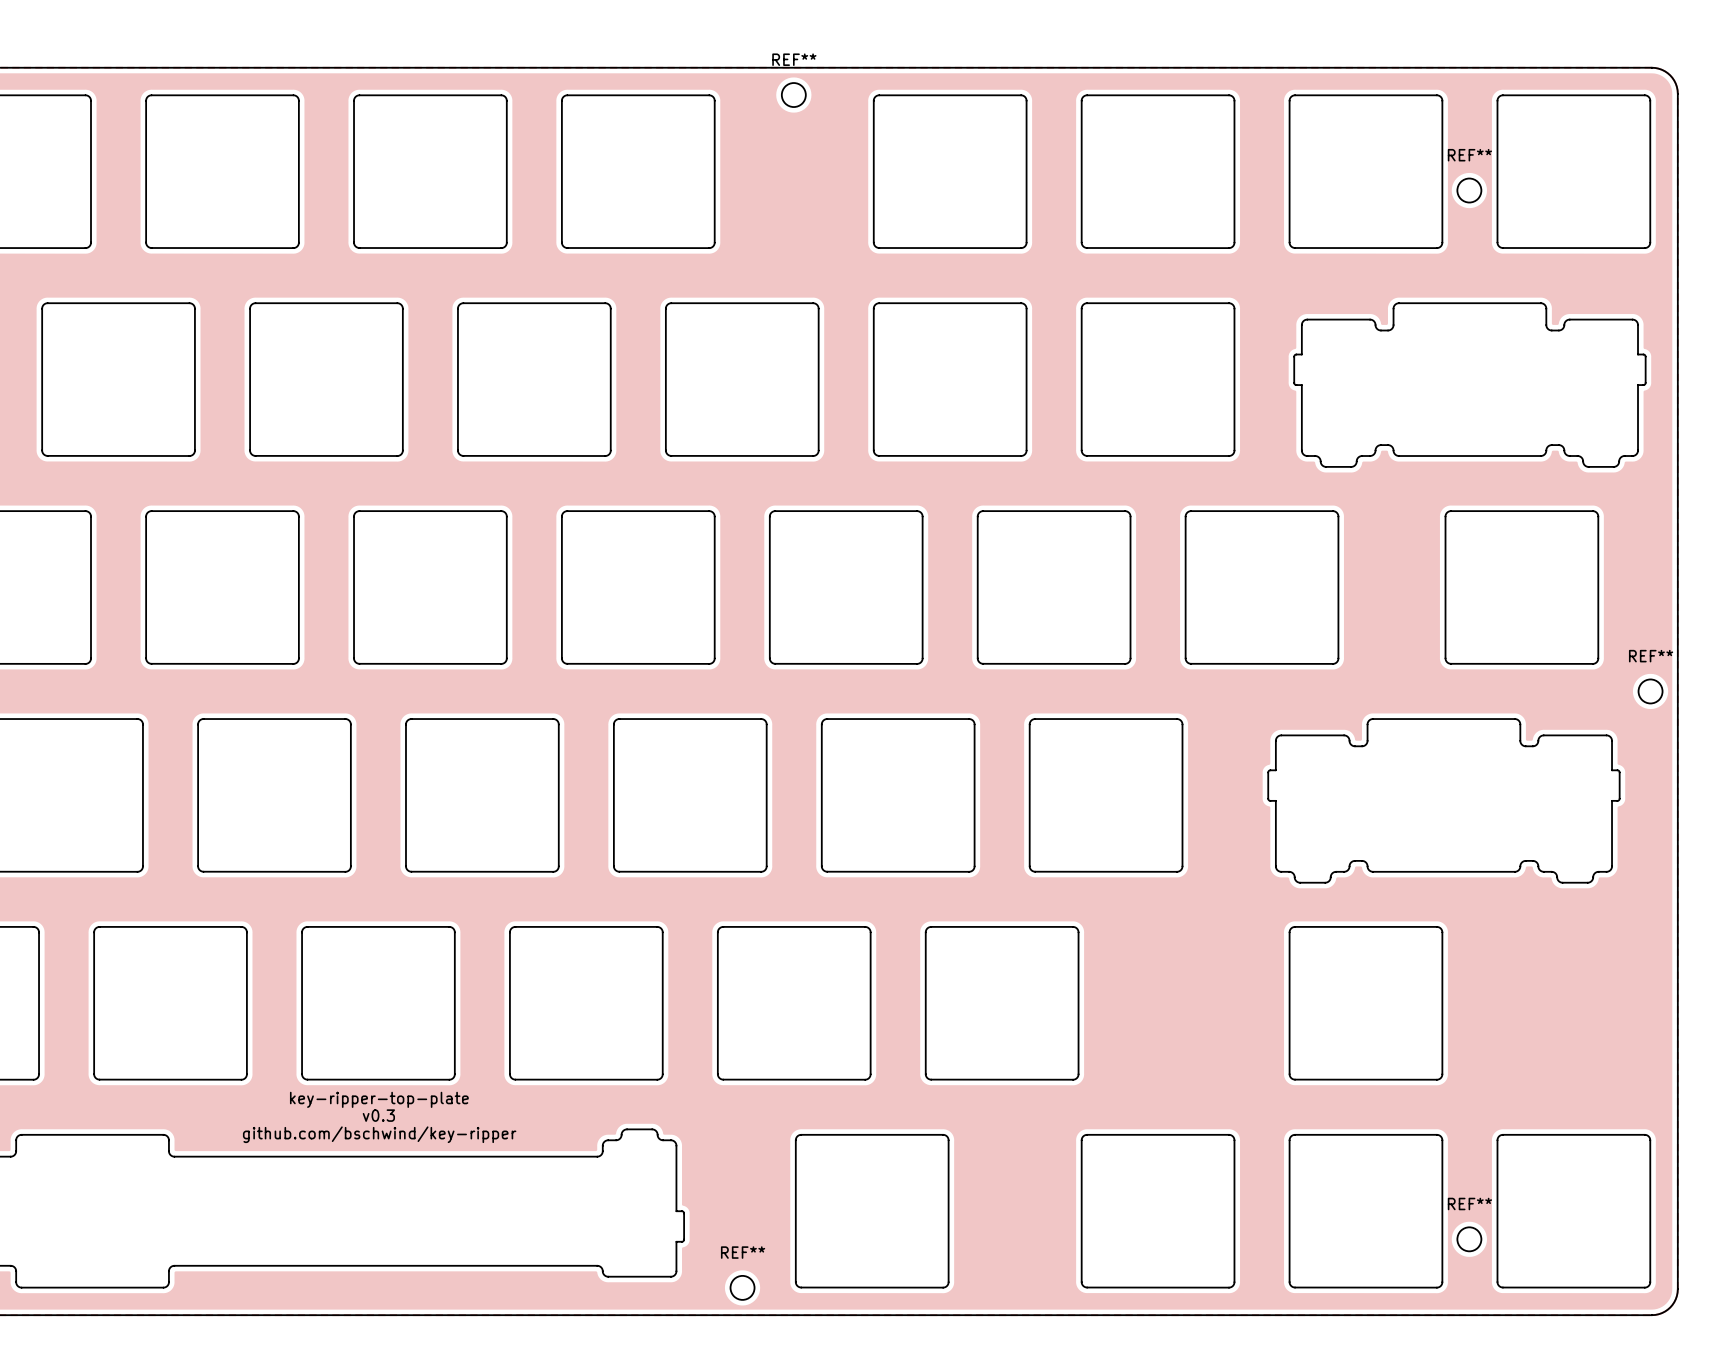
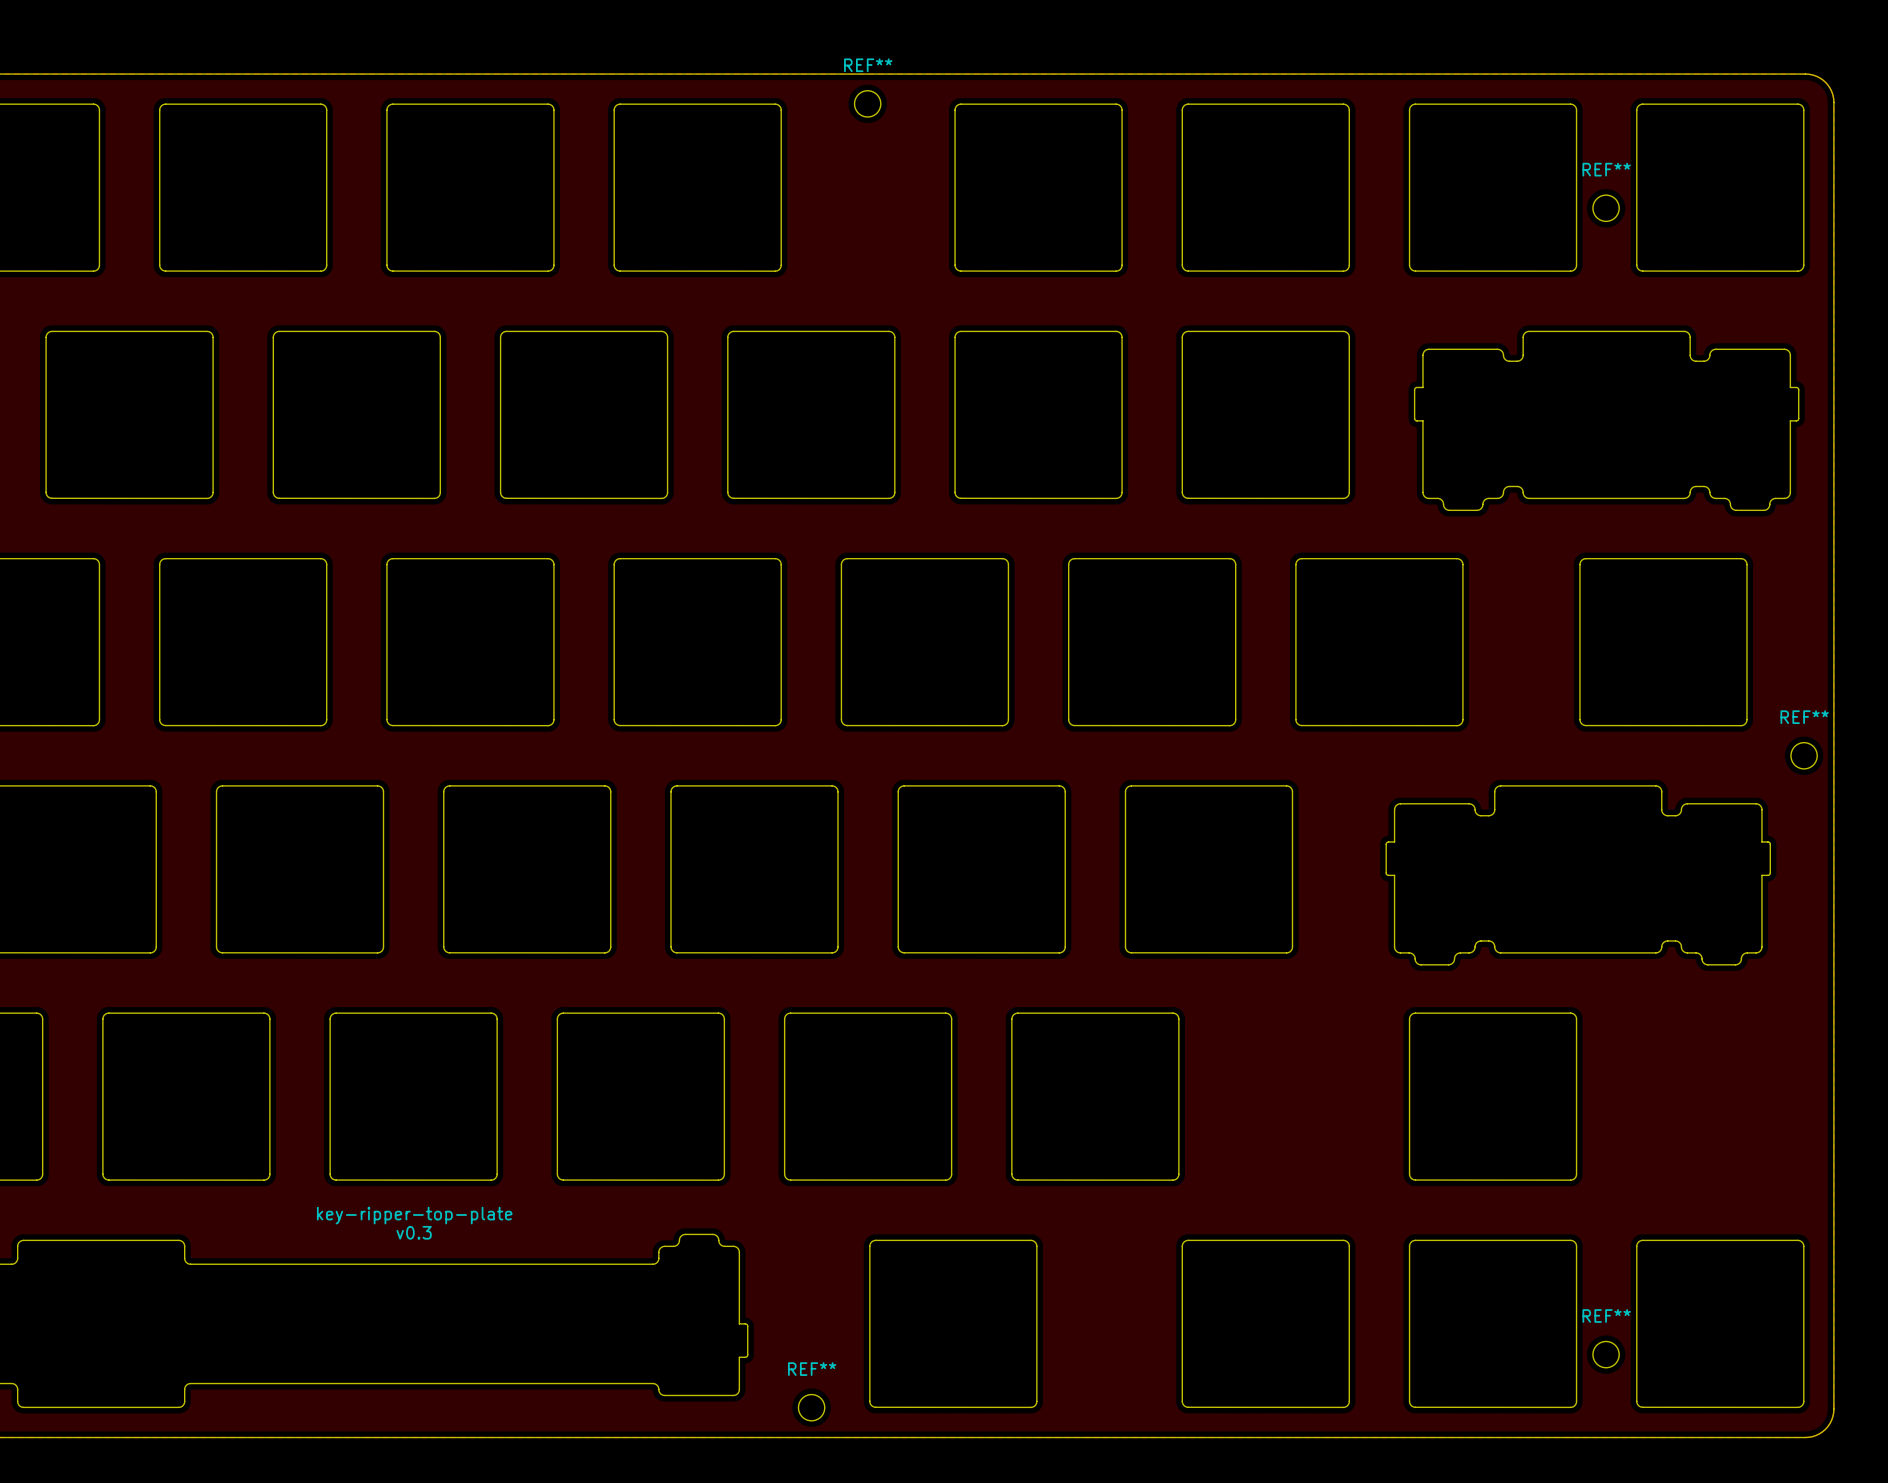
text: key-ripper-top-plate (379, 1099) -> none
text: v0.3 (378, 1115) -> key-ripper-top-plate (414, 1215)
text: github.com/bschwind/key-ripper (379, 1134) -> v0.3 (414, 1232)

